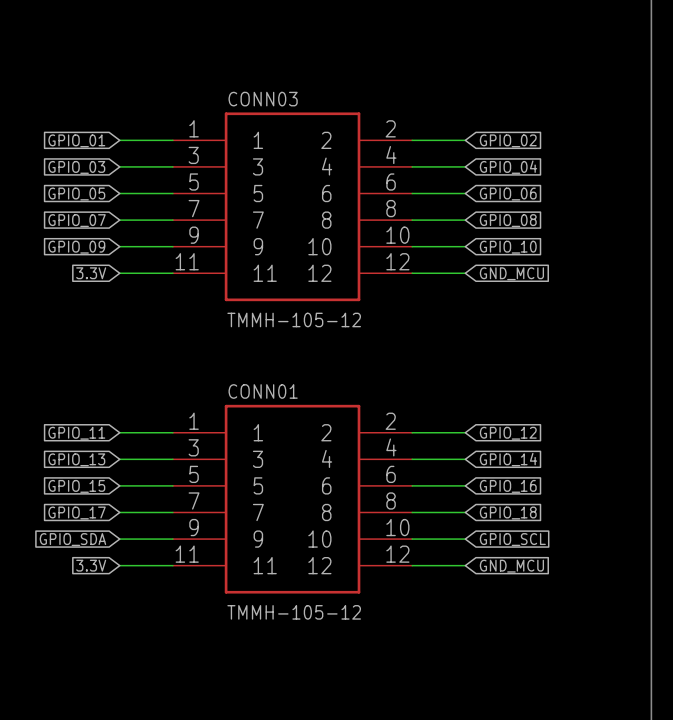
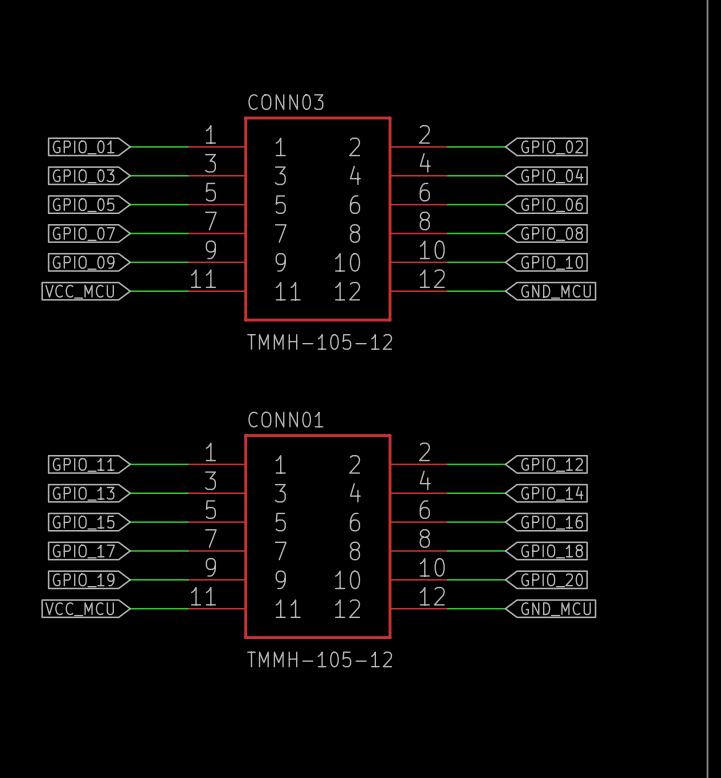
global label: 3.3V (91, 273) -> VCC_MCU (79, 291)
global label: GPIO_SDA (72, 539) -> GPIO_19 (83, 580)
global label: GPIO_SCL (512, 539) -> GPIO_20 (552, 580)
global label: 3.3V (91, 565) -> VCC_MCU (79, 609)

